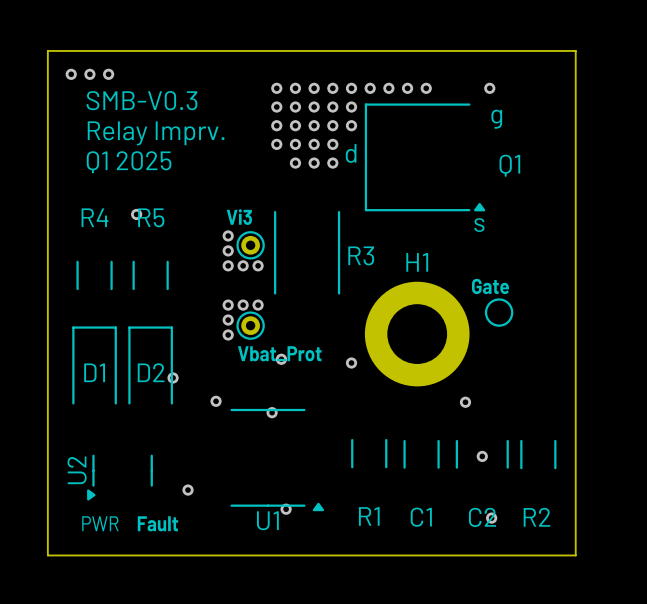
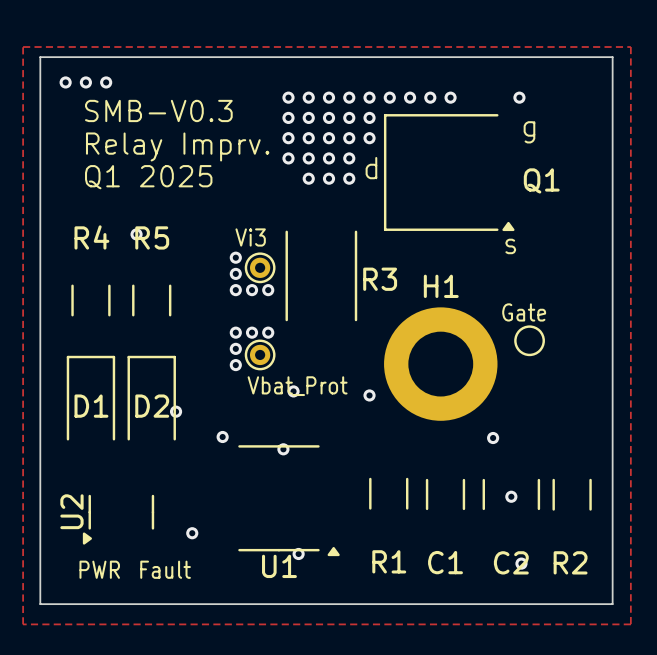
zone outline: none -> (23, 47) (630, 47) (630, 624) (23, 624) (23, 47)

